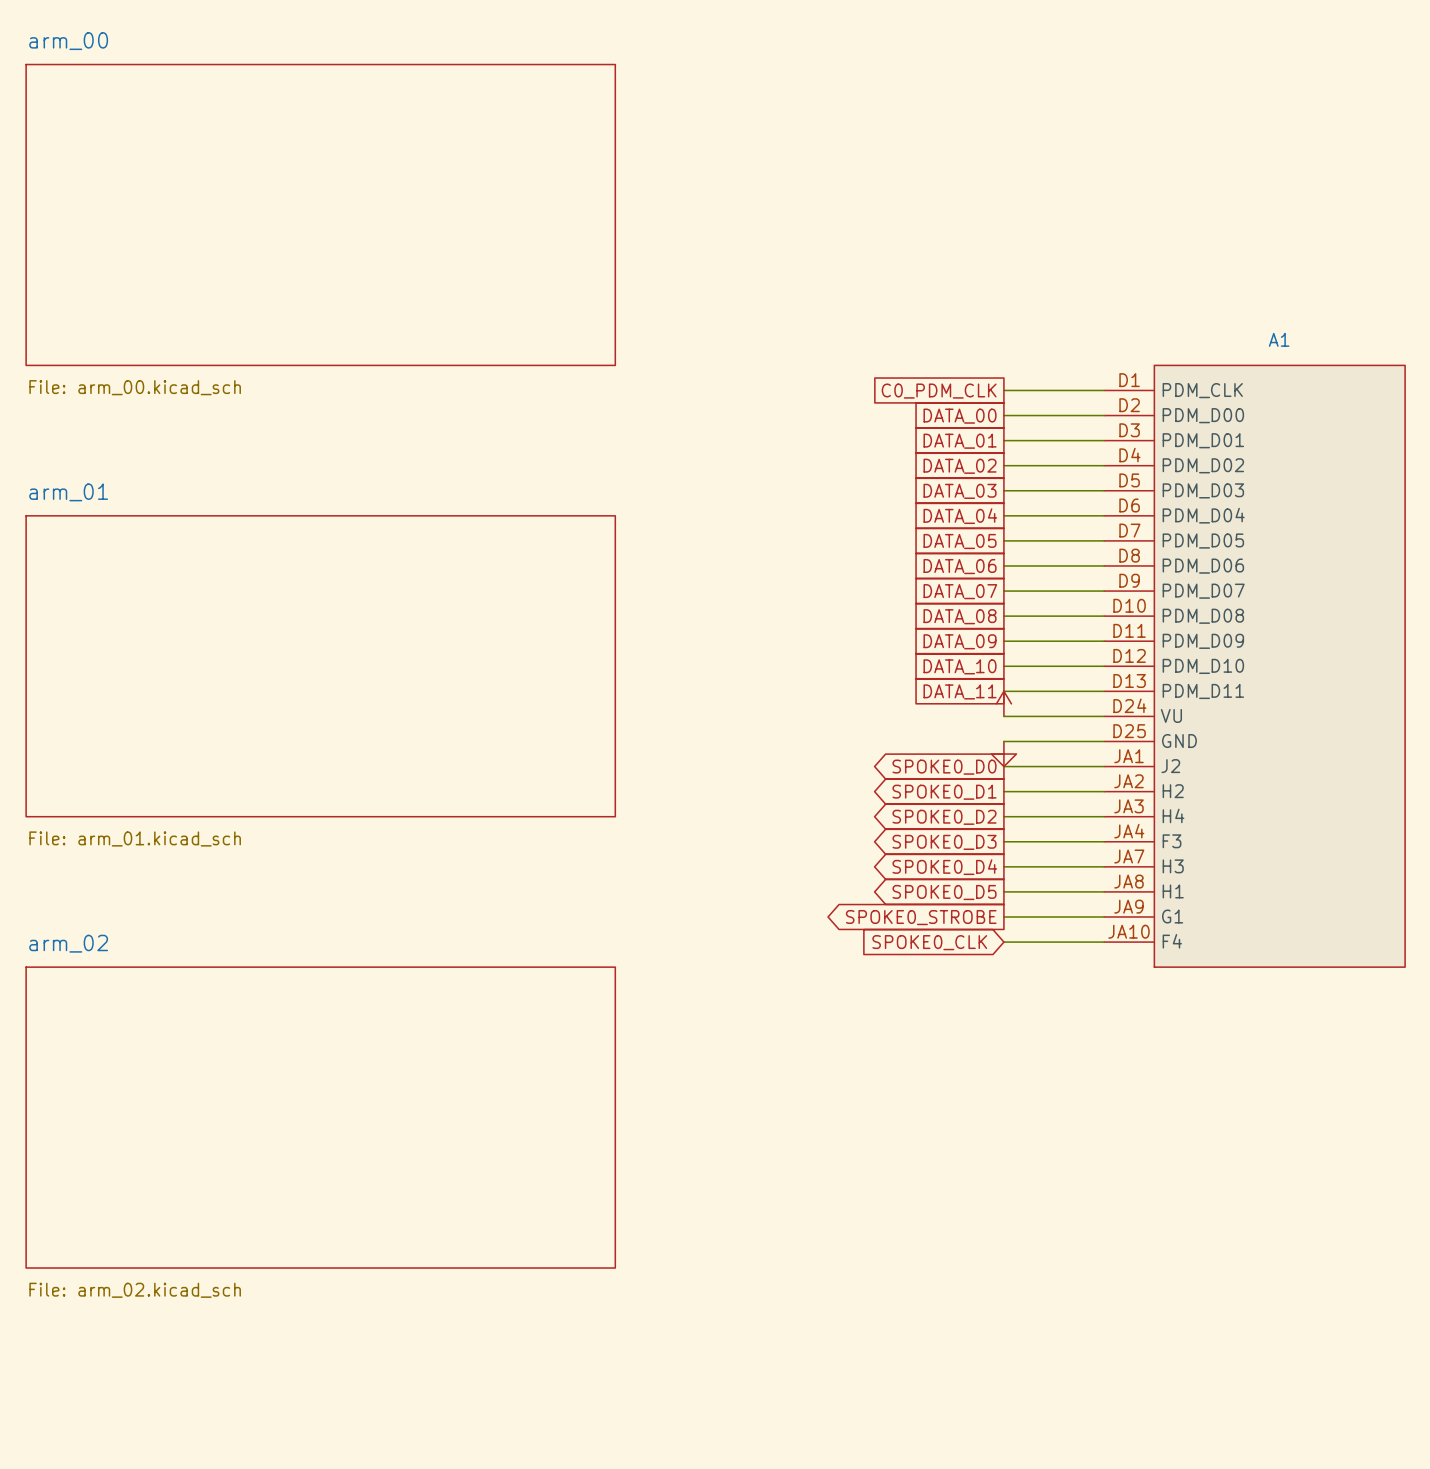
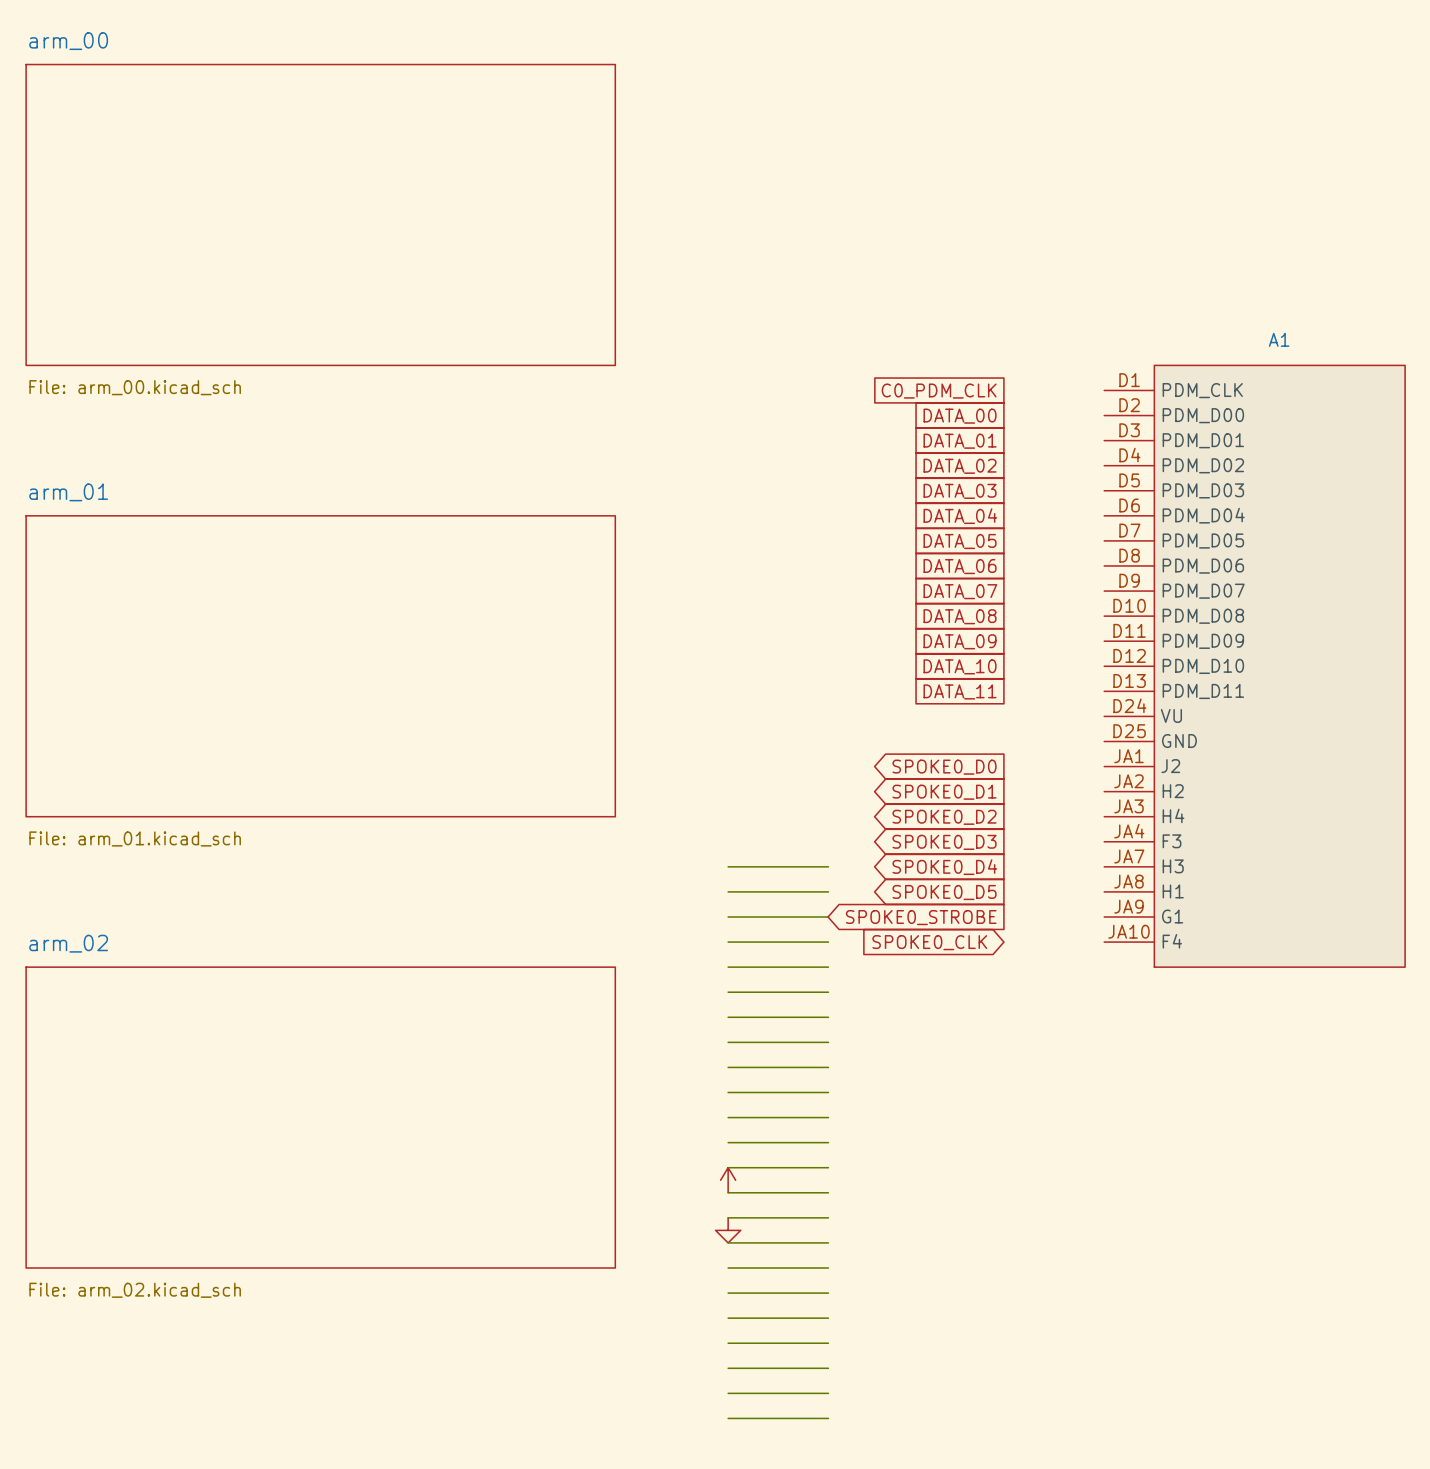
wire: (1003, 390) (1104, 390) -> none
wire: (1003, 415) (1104, 415) -> none
wire: (1003, 440) (1104, 440) -> none
wire: (1003, 465) (1104, 465) -> none
wire: (1003, 490) (1104, 490) -> none
wire: (1003, 515) (1104, 515) -> none
wire: (1003, 540) (1104, 540) -> none
wire: (1003, 565) (1104, 565) -> none
wire: (1003, 591) (1104, 591) -> none
wire: (1003, 616) (1104, 616) -> none
wire: (1003, 641) (1104, 641) -> none
wire: (1003, 666) (1104, 666) -> none
wire: (1003, 691) (1104, 691) -> none
power symbol: (1003, 703) -> none
wire: (1003, 716) (1104, 716) -> none
wire: (1003, 741) (1104, 741) -> none
power symbol: (1003, 754) -> none
wire: (1003, 766) (1104, 766) -> none
wire: (1003, 791) (1104, 791) -> none
wire: (1003, 816) (1104, 816) -> none
wire: (1003, 841) (1104, 841) -> none
wire: none -> (728, 866) (828, 866)
wire: (1003, 866) (1104, 866) -> none
wire: none -> (728, 891) (828, 891)
wire: (1003, 891) (1104, 891) -> none
wire: none -> (728, 916) (828, 916)
wire: (1003, 916) (1104, 916) -> none
wire: none -> (728, 942) (828, 942)
wire: (1003, 942) (1104, 942) -> none
wire: none -> (728, 967) (828, 967)
wire: none -> (728, 992) (828, 992)
wire: none -> (728, 1017) (828, 1017)
wire: none -> (728, 1042) (828, 1042)
wire: none -> (728, 1067) (828, 1067)
wire: none -> (728, 1092) (828, 1092)
wire: none -> (728, 1117) (828, 1117)
wire: none -> (728, 1142) (828, 1142)
wire: none -> (728, 1167) (828, 1167)
power symbol: none -> (728, 1180)
wire: none -> (728, 1192) (828, 1192)
wire: none -> (728, 1217) (828, 1217)
power symbol: none -> (728, 1230)
wire: none -> (728, 1242) (828, 1242)
wire: none -> (728, 1268) (828, 1268)
wire: none -> (728, 1293) (828, 1293)
wire: none -> (728, 1318) (828, 1318)
wire: none -> (728, 1343) (828, 1343)
wire: none -> (728, 1368) (828, 1368)
wire: none -> (728, 1393) (828, 1393)
wire: none -> (728, 1418) (828, 1418)

